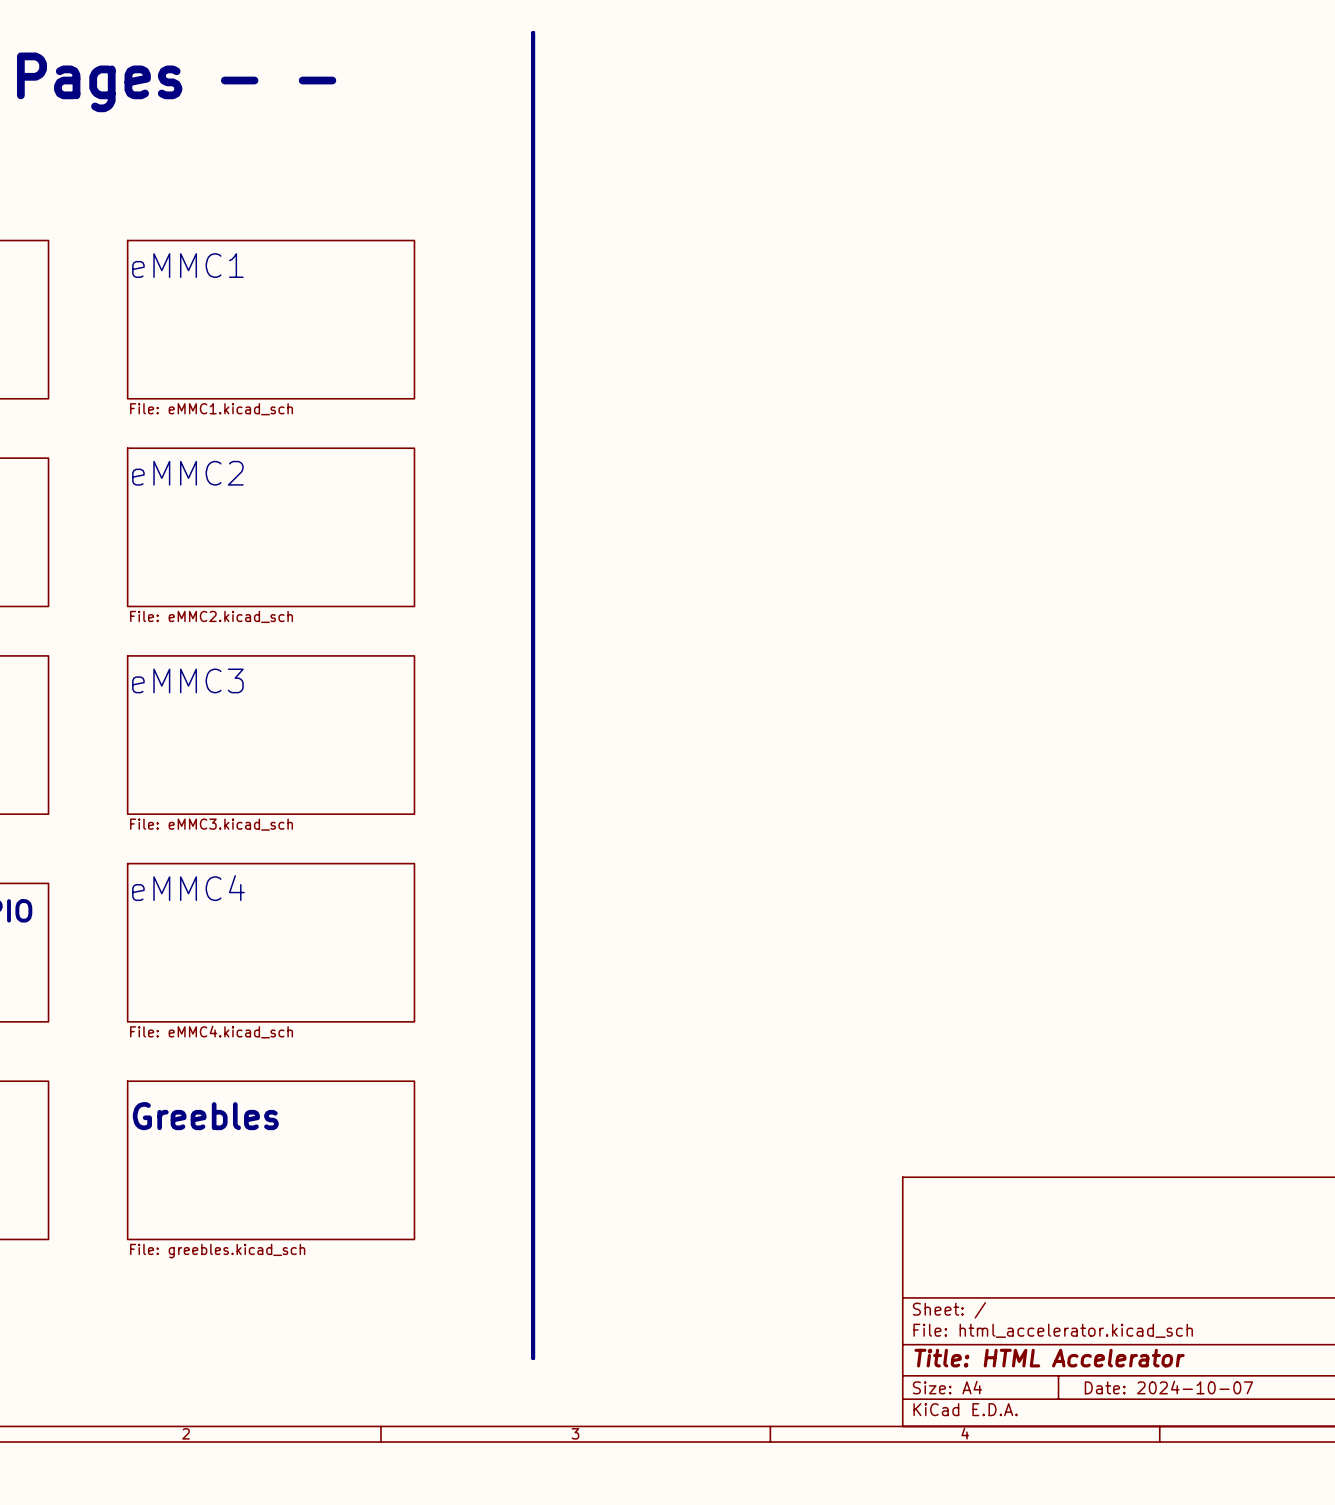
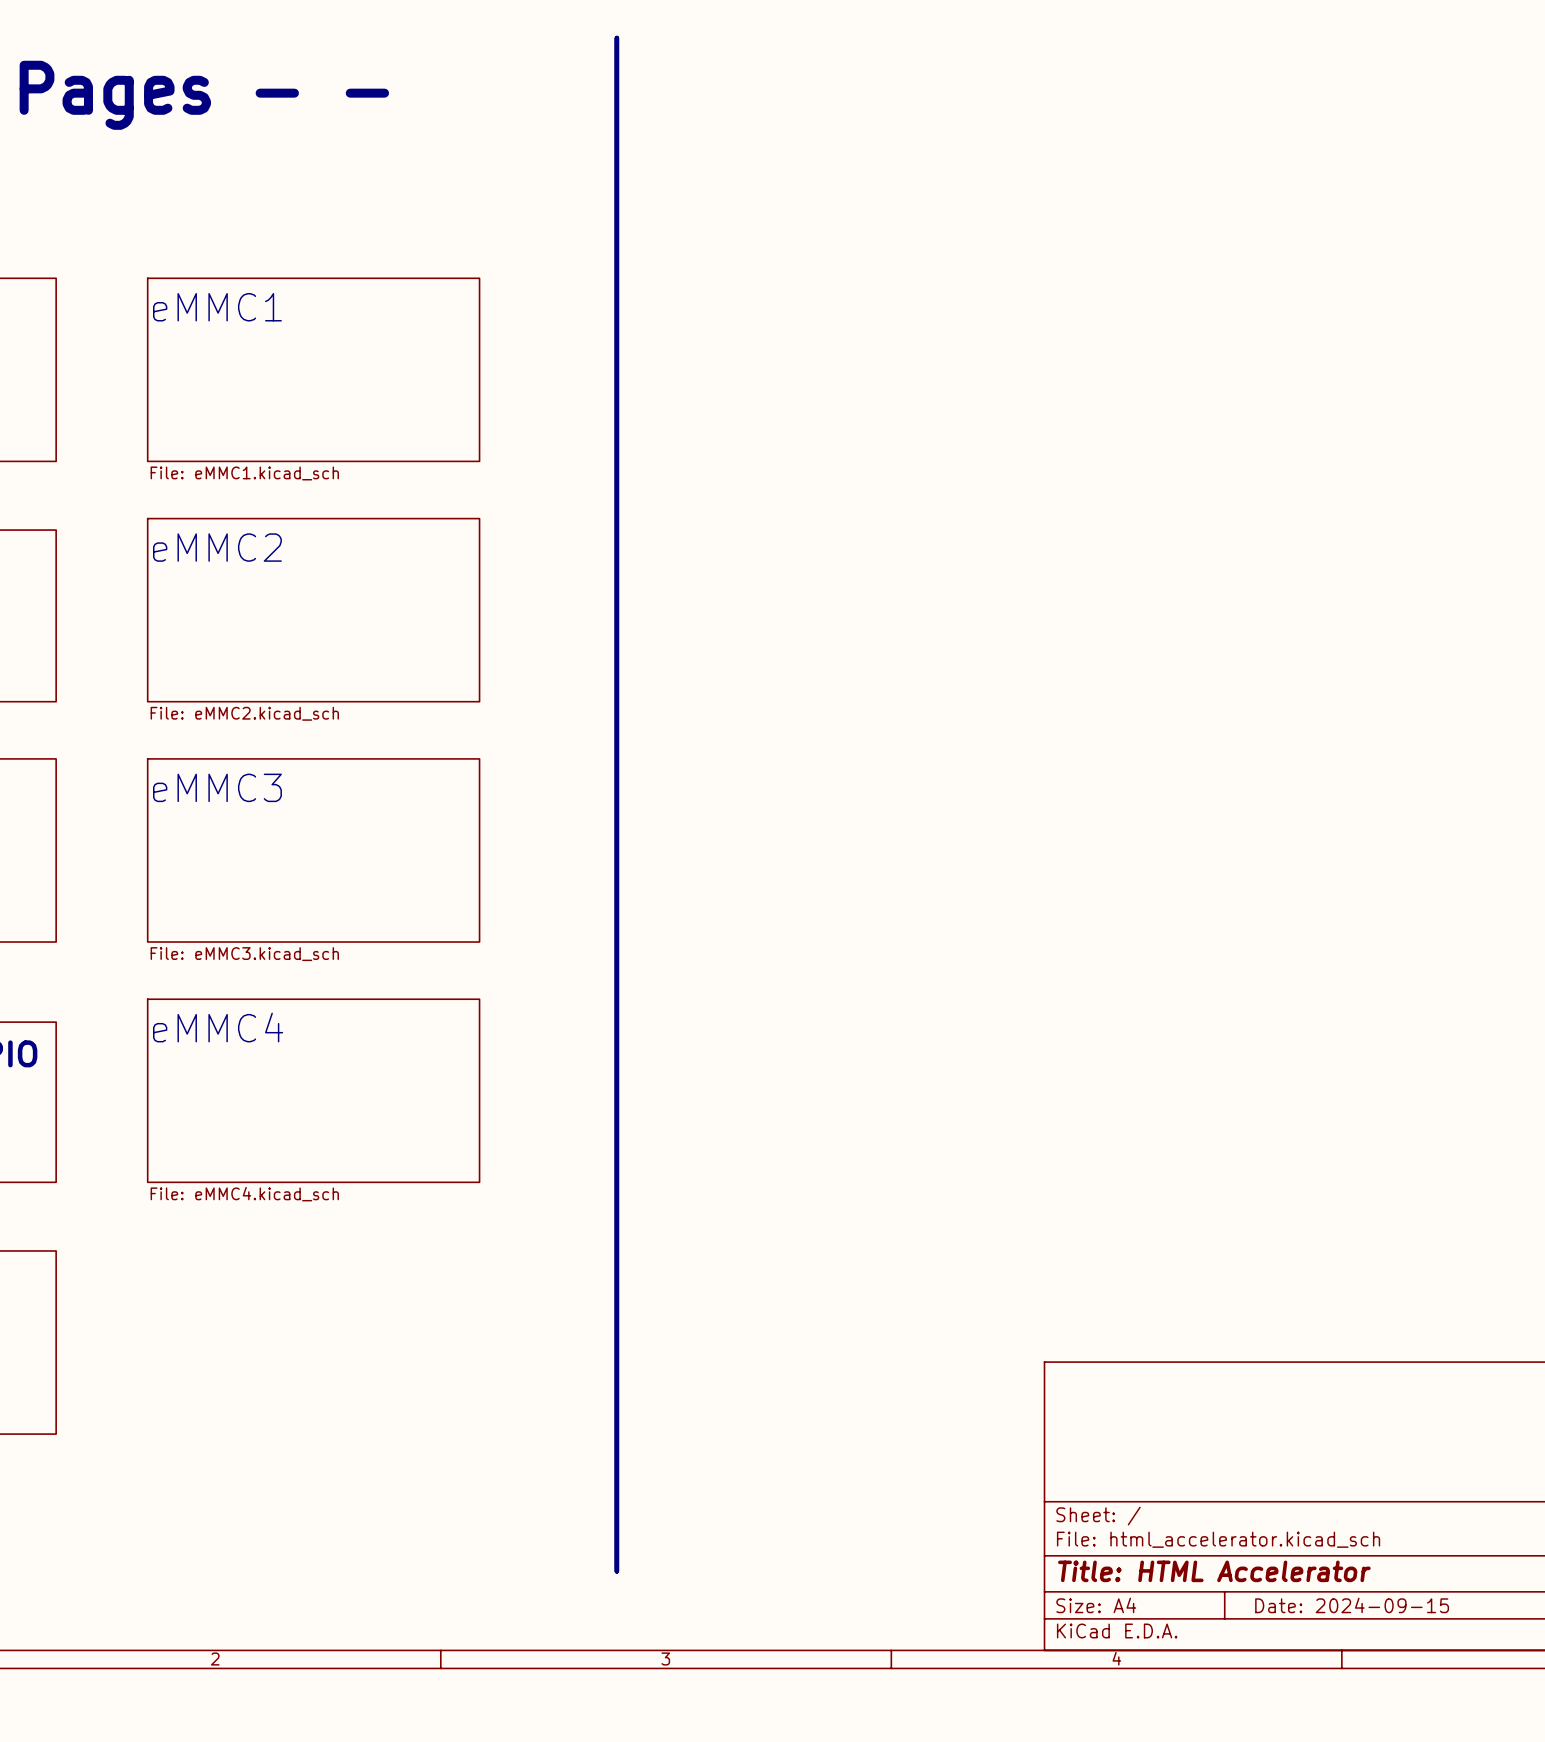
sheet Greebles: File: greebles.kicad_sch (271, 1160) -> none
title block: Date: 2024-10-07 (1168, 1387) -> Date: 2024-09-15 (1352, 1605)

